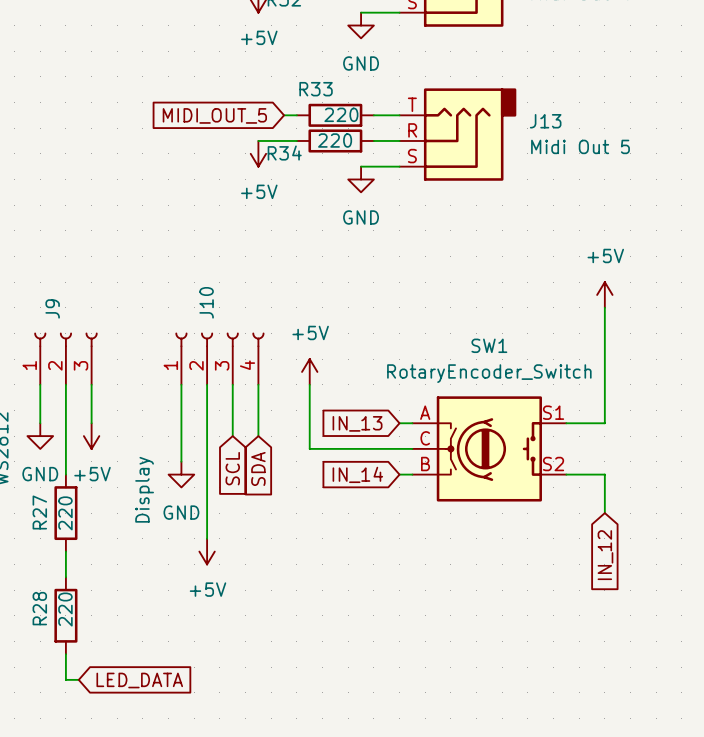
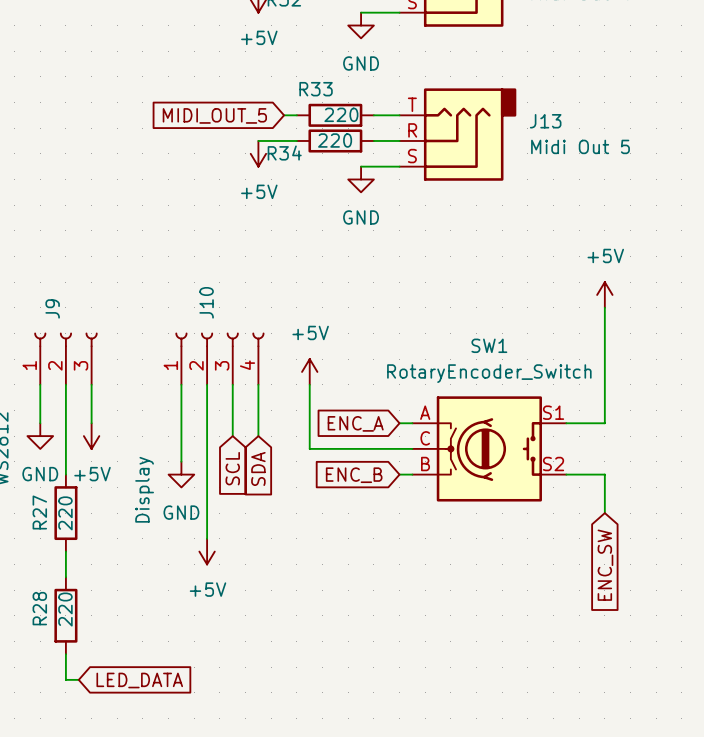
global label: IN_13 (357, 423) -> ENC_A (355, 423)
global label: IN_14 (357, 474) -> ENC_B (354, 475)
global label: IN_12 (605, 555) -> ENC_SW (605, 565)

